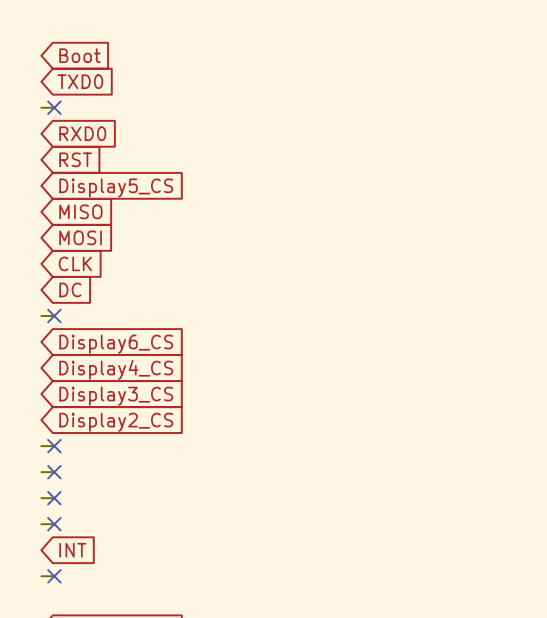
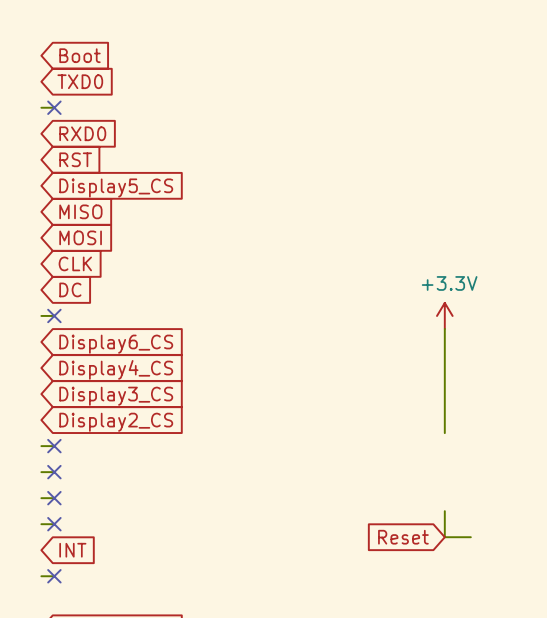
power symbol: none -> +3.3V (444, 315)
wire: none -> (444, 328) (444, 433)
wire: none -> (444, 511) (444, 537) (470, 537)
global label: none -> Reset (403, 537)

